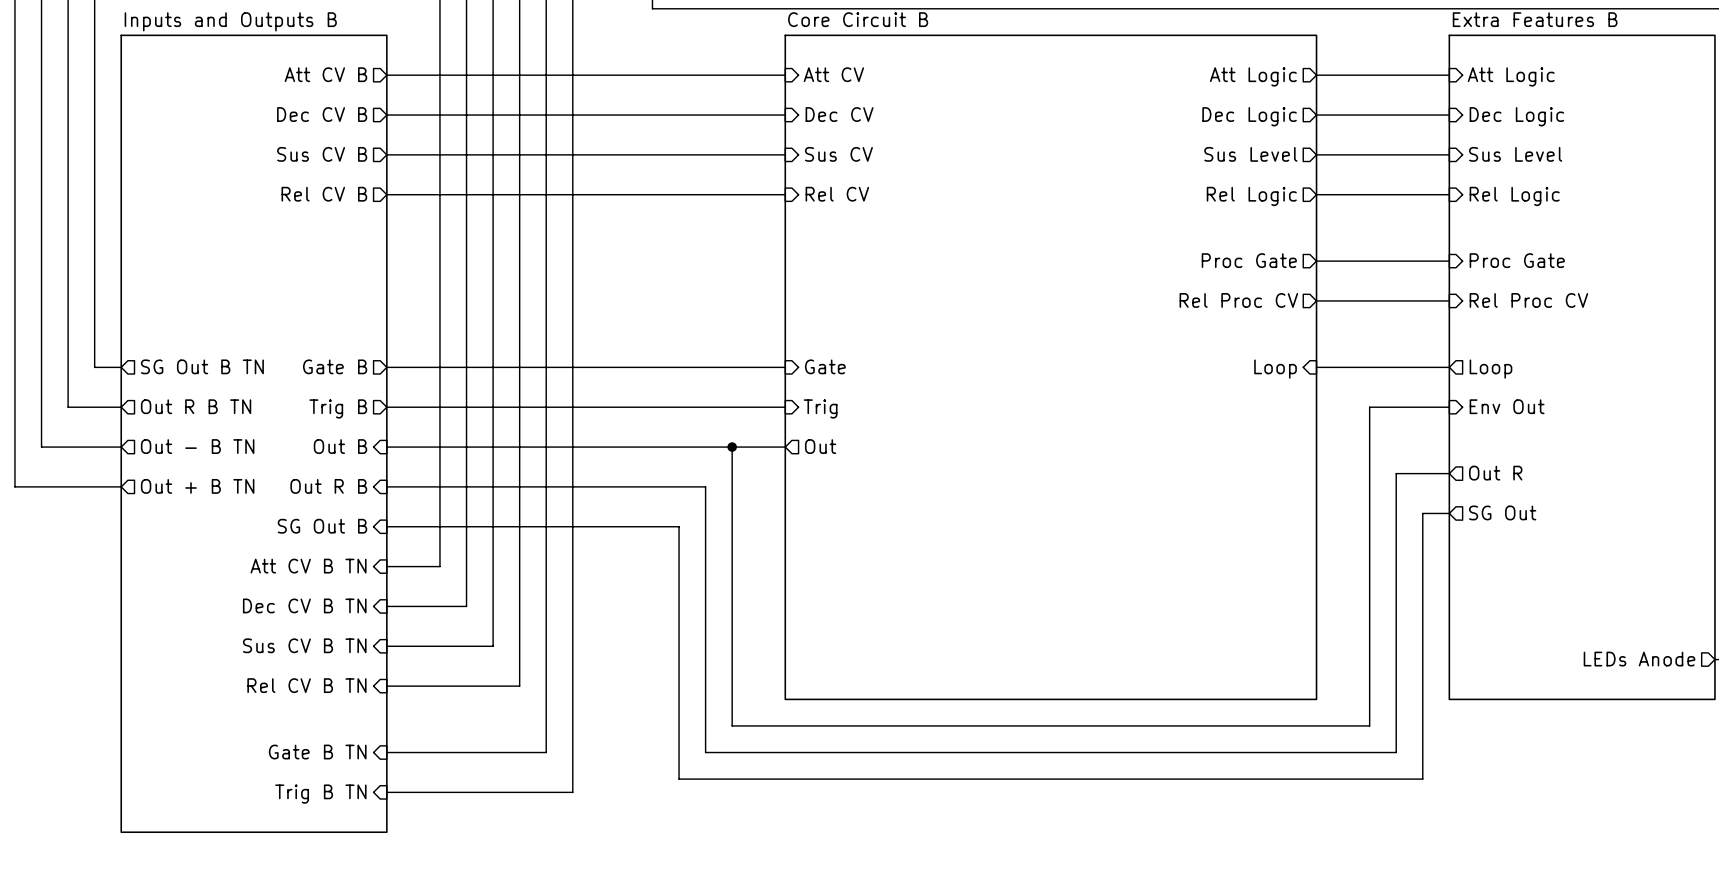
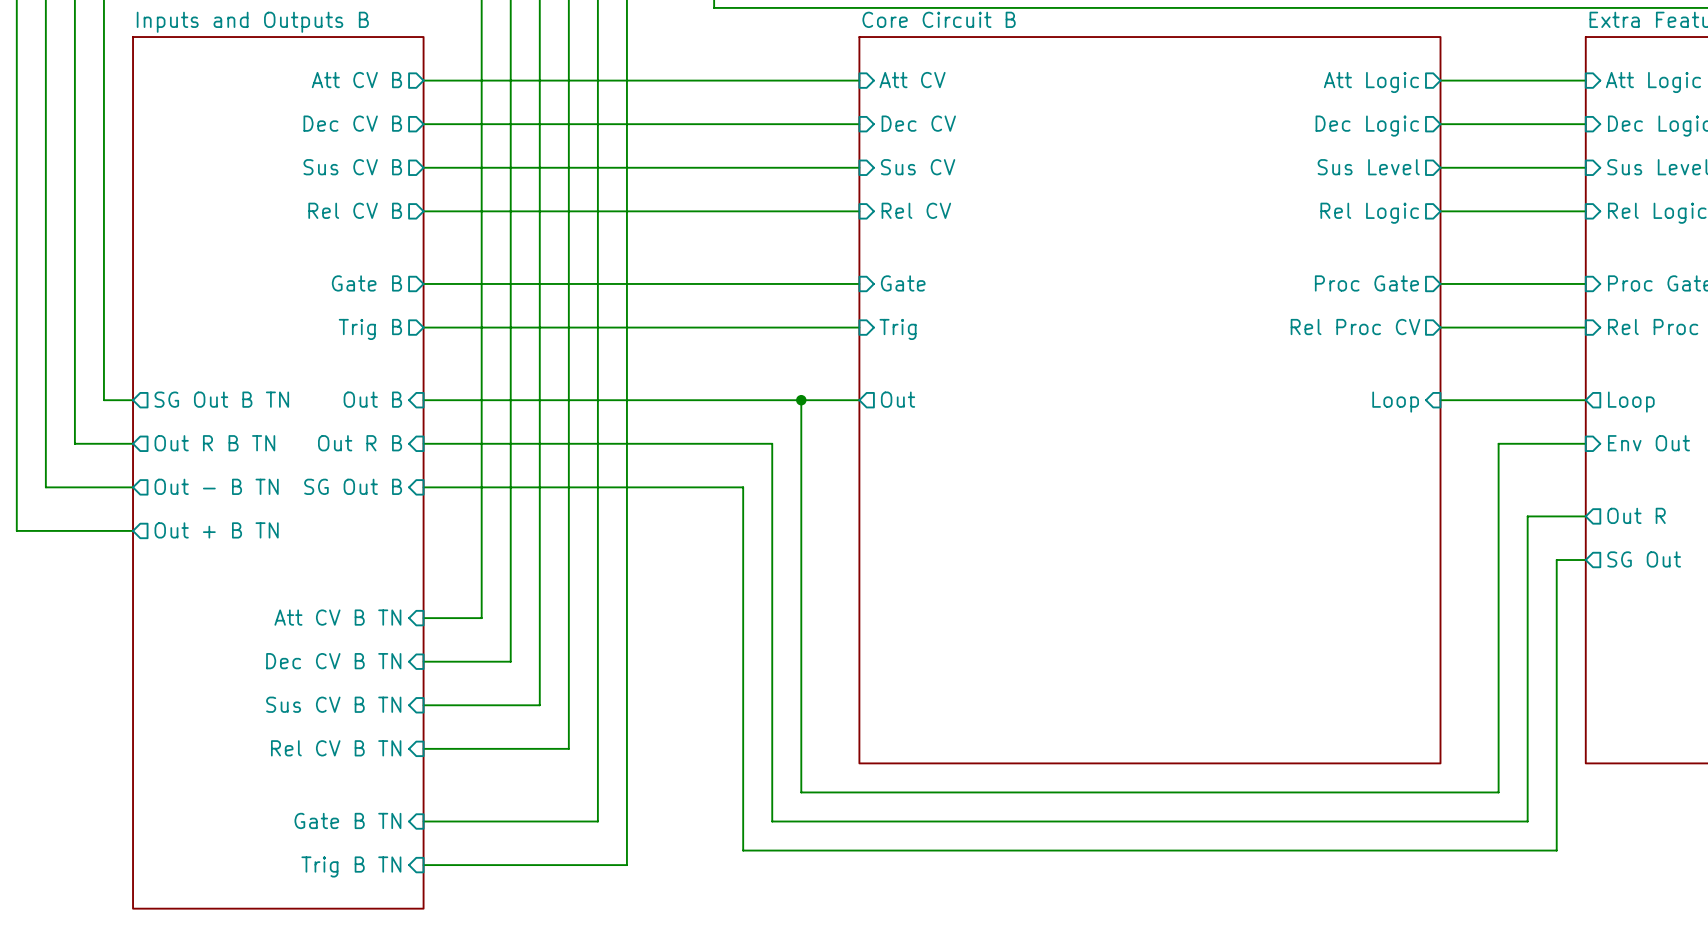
sheet pin: none -> Gate B (366, 283)
sheet pin: none -> Gate (903, 283)
wire: none -> (423, 283) (859, 283)
wire: none -> (423, 327) (859, 327)
sheet pin: none -> Trig B (370, 329)
sheet pin shape: output (335, 366) -> input (372, 399)
sheet pin: Gate B (335, 366) -> Out B (372, 399)
sheet pin shape: input (825, 366) -> output (898, 399)
sheet pin: Gate (825, 366) -> Out (898, 399)
wire: none -> (801, 400) (801, 487)
junction: none -> (801, 400)
wire: (705, 407) (785, 407) -> (772, 443) (772, 530)
sheet pin shape: output (338, 408) -> input (360, 443)
sheet pin: Trig B (338, 408) -> Out R B (360, 443)
sheet pin position: Trig (820, 408) -> Trig (898, 329)
sheet pin: Out B (340, 446) -> SG Out B (353, 486)
sheet pin: Out (820, 446) -> none
wire: (679, 447) (785, 447) -> (743, 487) (743, 574)
junction: (732, 447) -> none
sheet pin: Out R B (328, 486) -> none
wire: (386, 486) (705, 486) -> none
sheet pin: SG Out B (322, 526) -> none
wire: (386, 526) (679, 526) -> none

